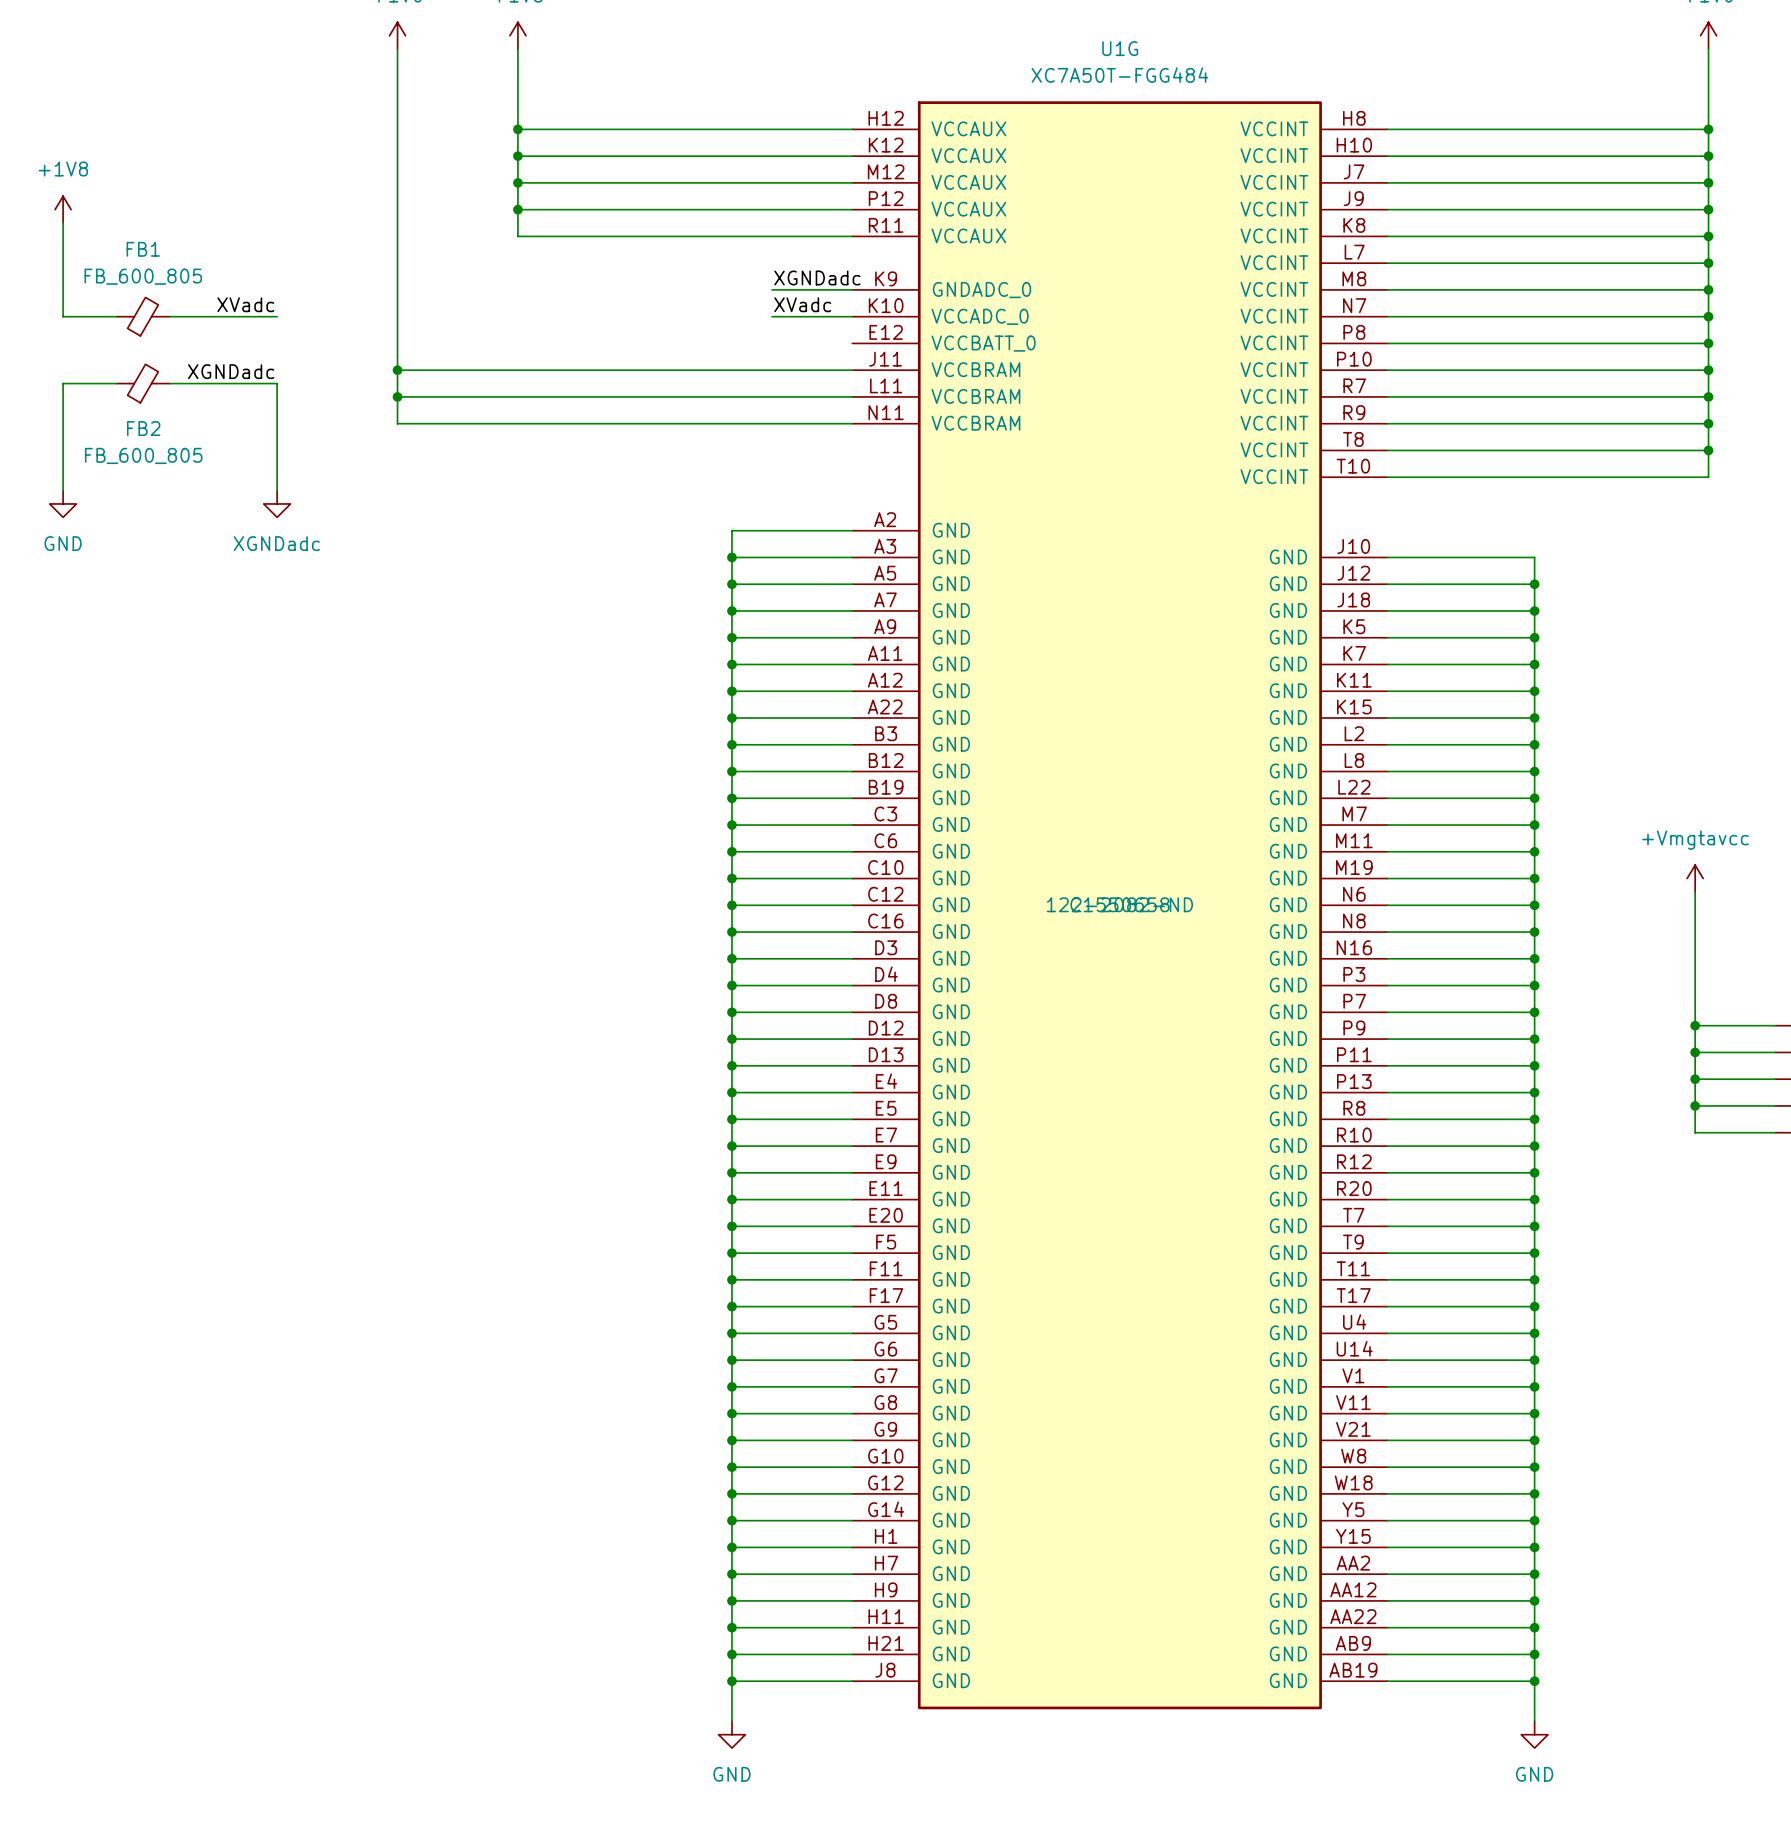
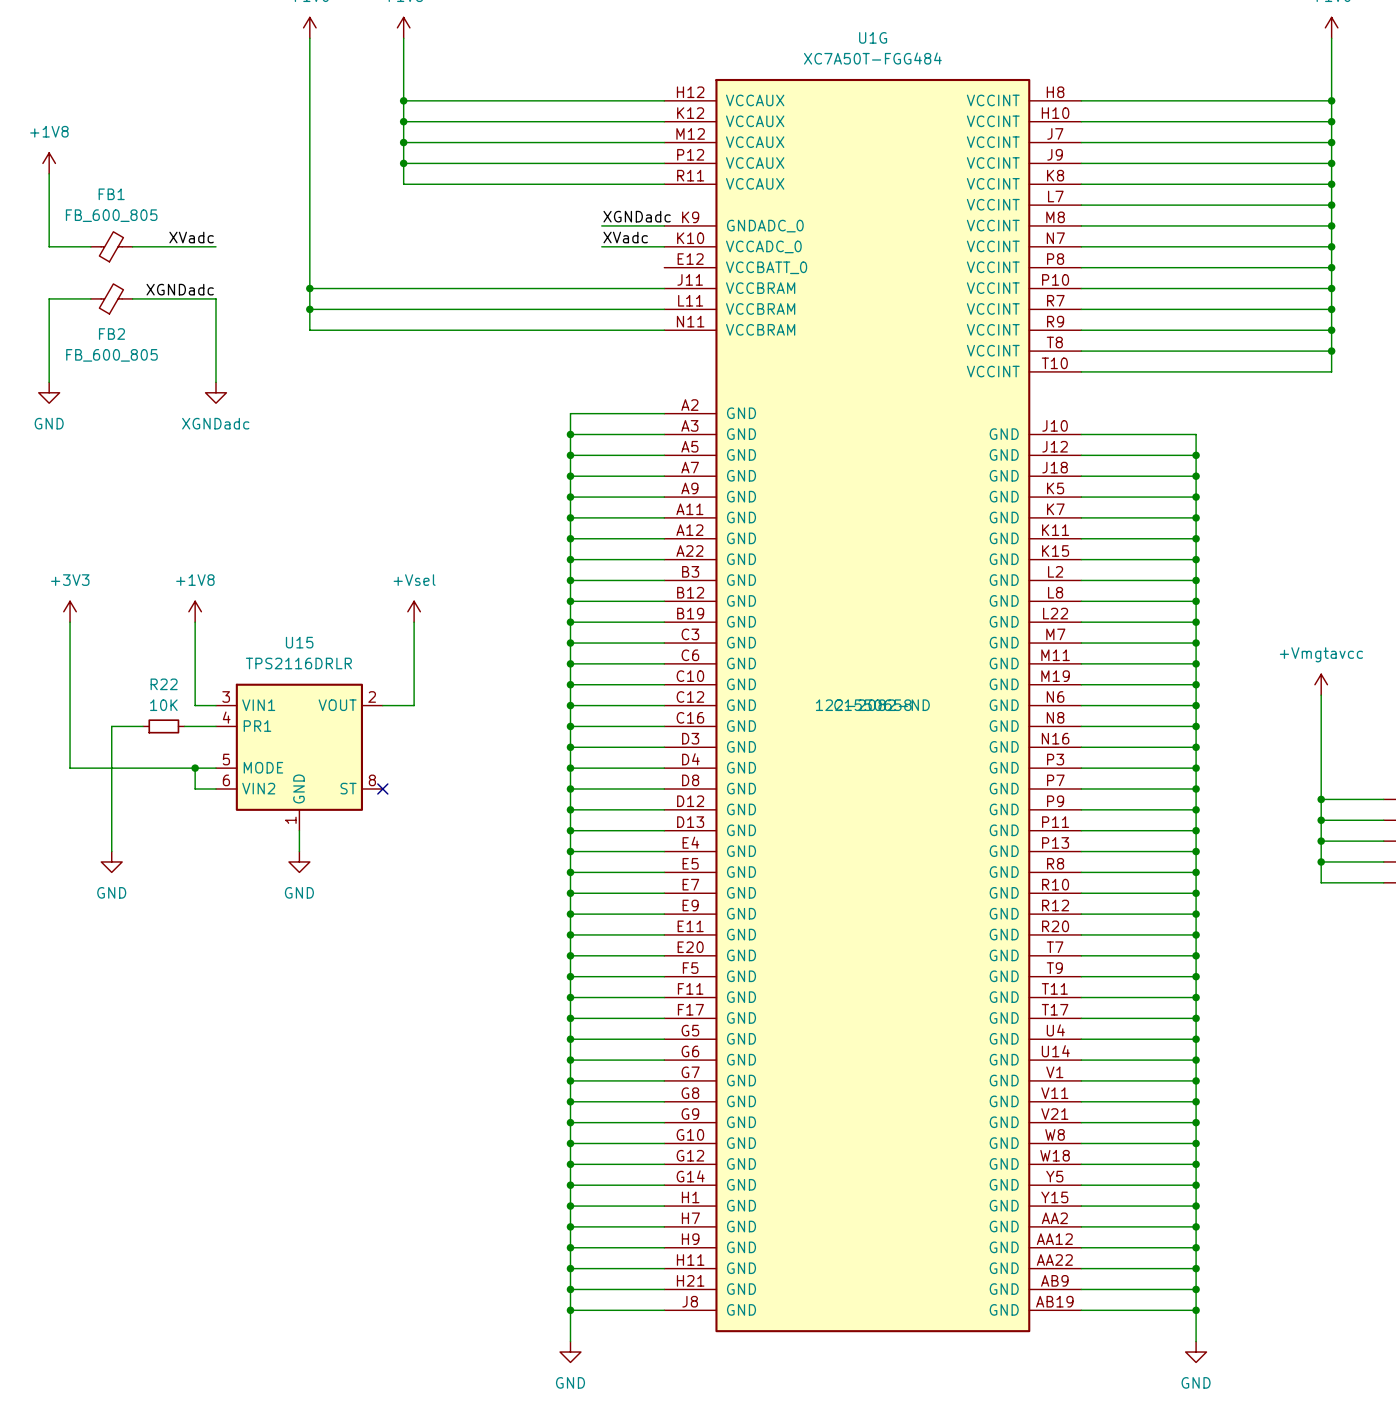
power symbol: none -> +3V3 (70, 611)
power symbol: none -> +1V8 (195, 611)
power symbol: none -> +Vsel (414, 611)
wire: none -> (70, 622) (70, 768) (215, 768)
wire: none -> (195, 622) (195, 705) (215, 705)
wire: none -> (414, 622) (414, 705) (382, 705)
wire: none -> (143, 726) (111, 726) (111, 851)
R22: none -> 10K (163, 726)
wire: none -> (184, 726) (215, 726)
U15: none -> TPS2116DRLR (299, 757)
wire: none -> (195, 768) (195, 788) (215, 788)
junction: none -> (195, 768)
no-connect mark: none -> (382, 788)
wire: none -> (299, 830) (299, 851)
power symbol: none -> GND (111, 861)
power symbol: none -> GND (299, 861)

